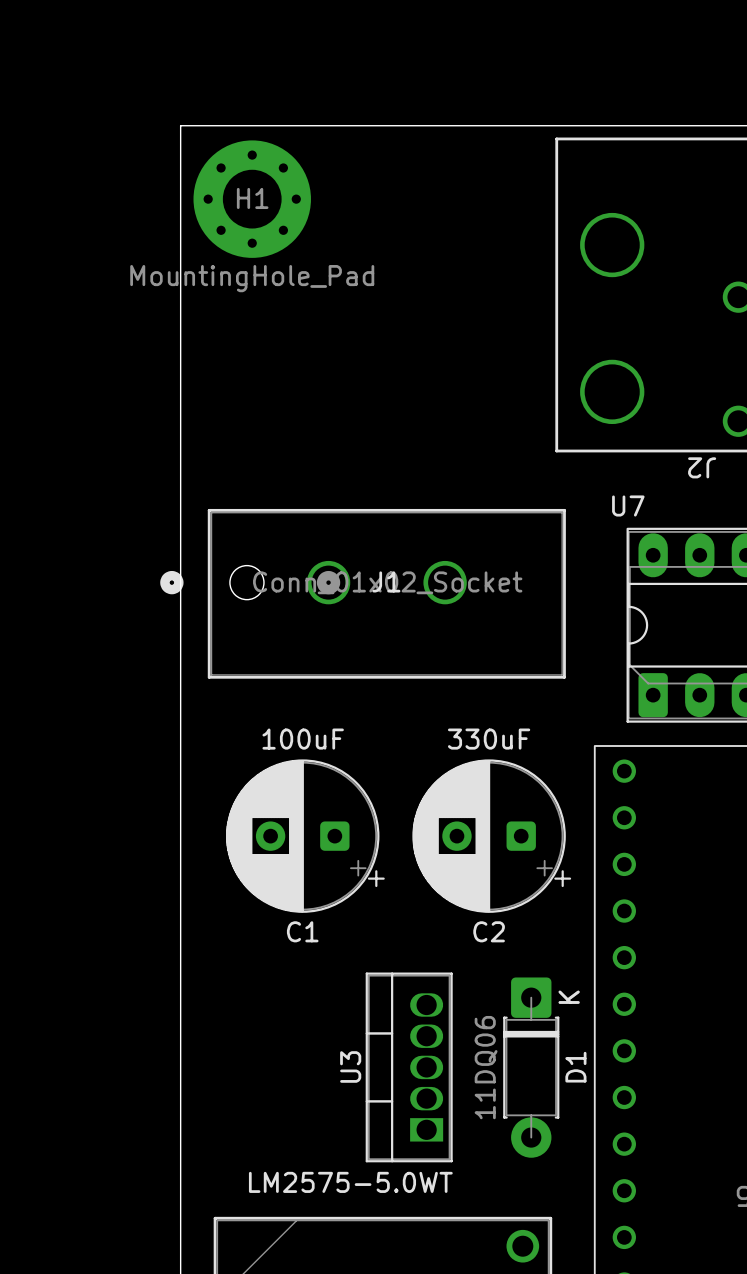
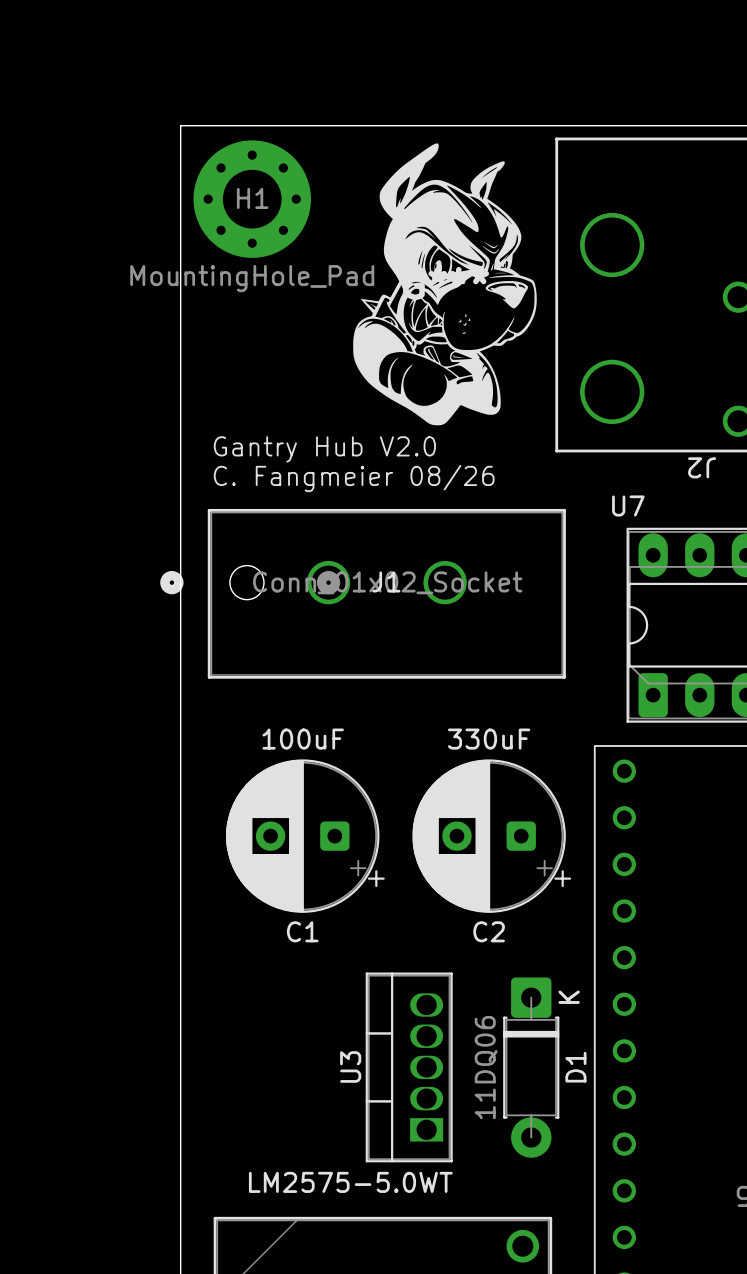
part: none -> (444, 284)
text: none -> Gantry Hub V2.0 (324, 449)
text: none -> C. Fangmeier 08/26 (354, 478)

